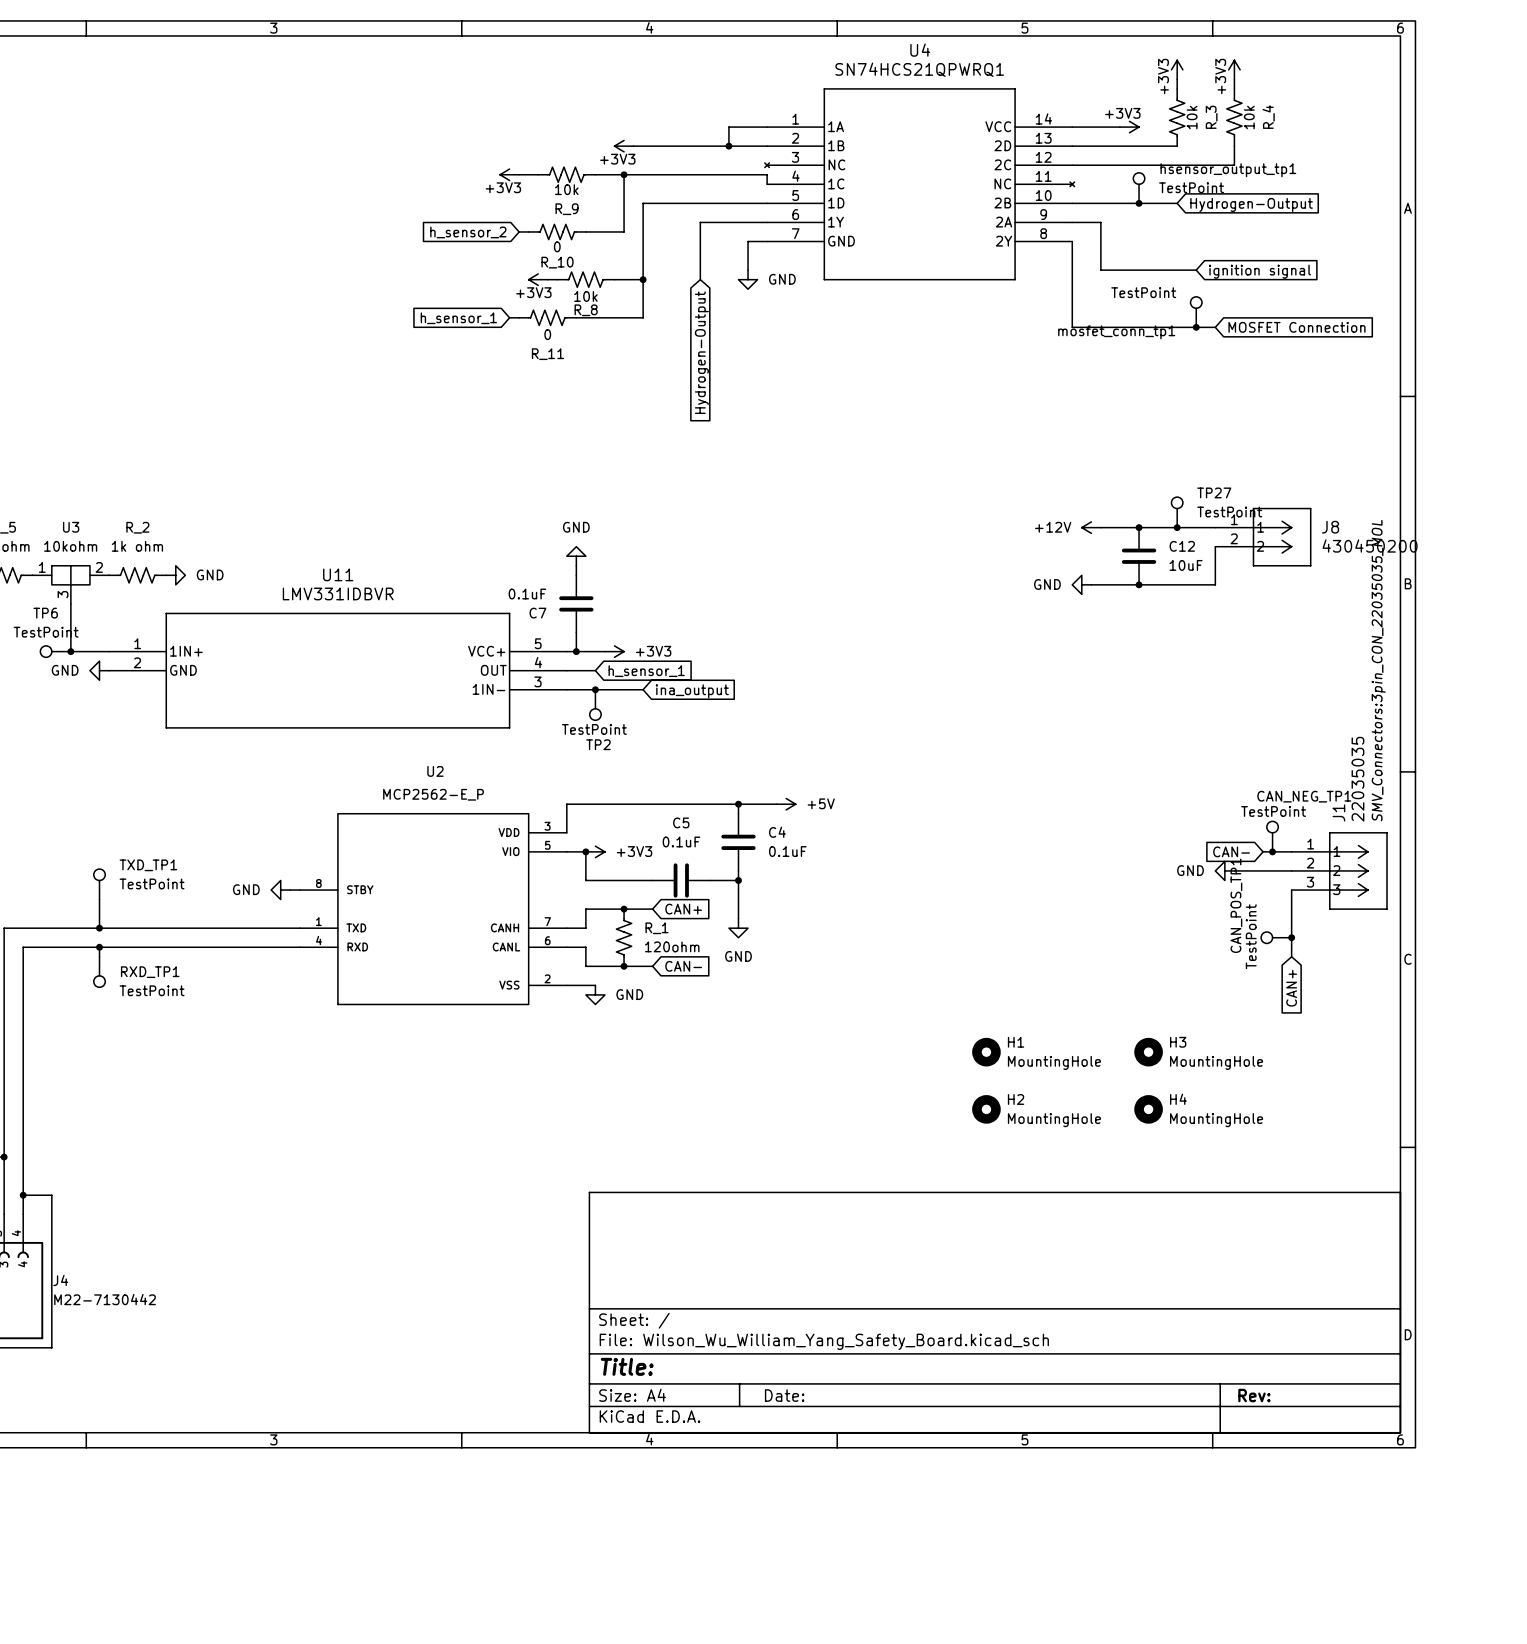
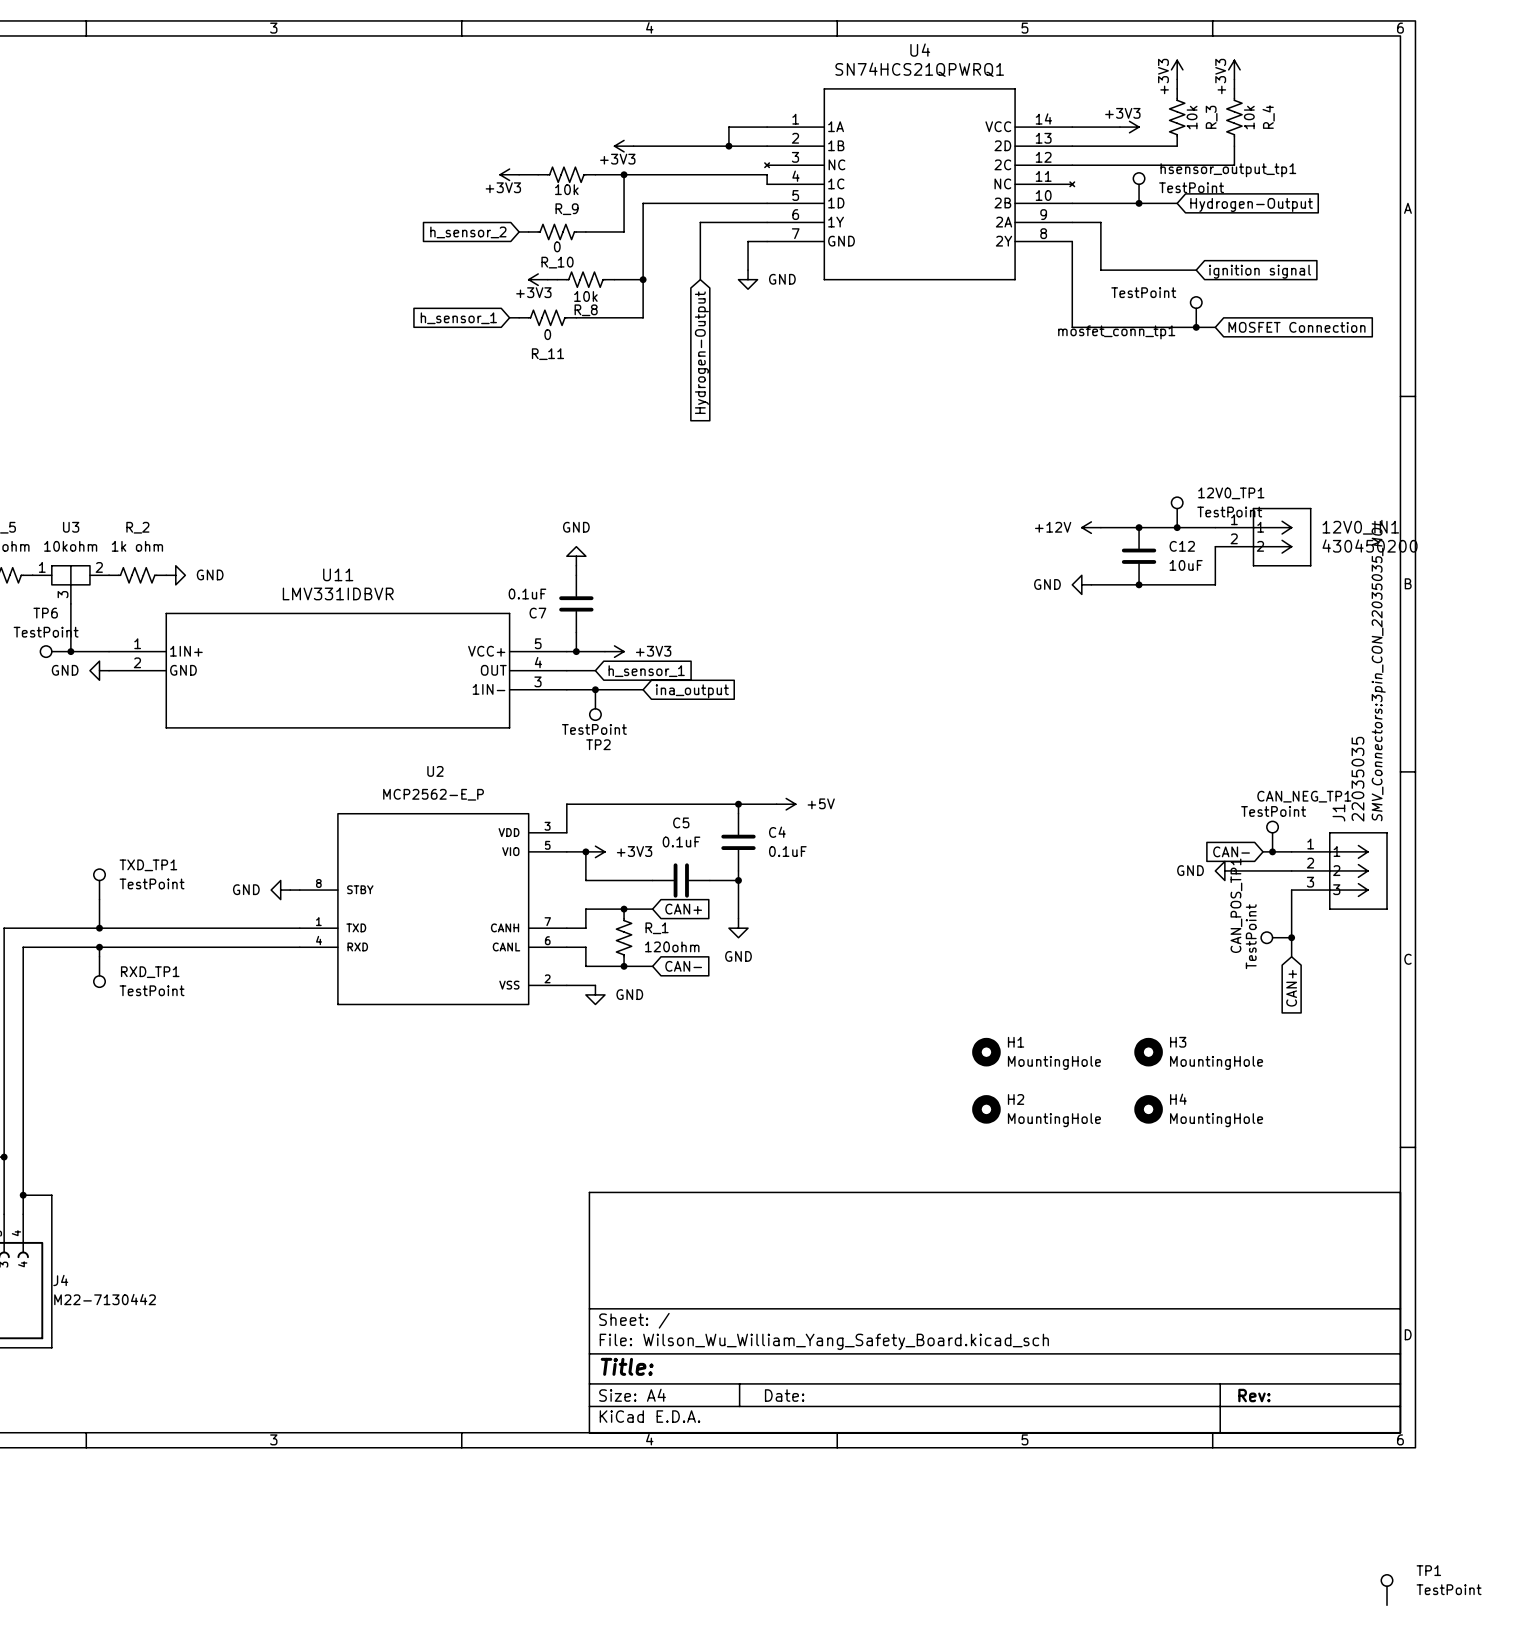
TP27 name: TP27 (1214, 492) -> 12V0_TP1 (1231, 493)
J8 name: J8 (1330, 527) -> 12V0_IN1 (1360, 527)
TP1: none -> TestPoint (1387, 1590)

